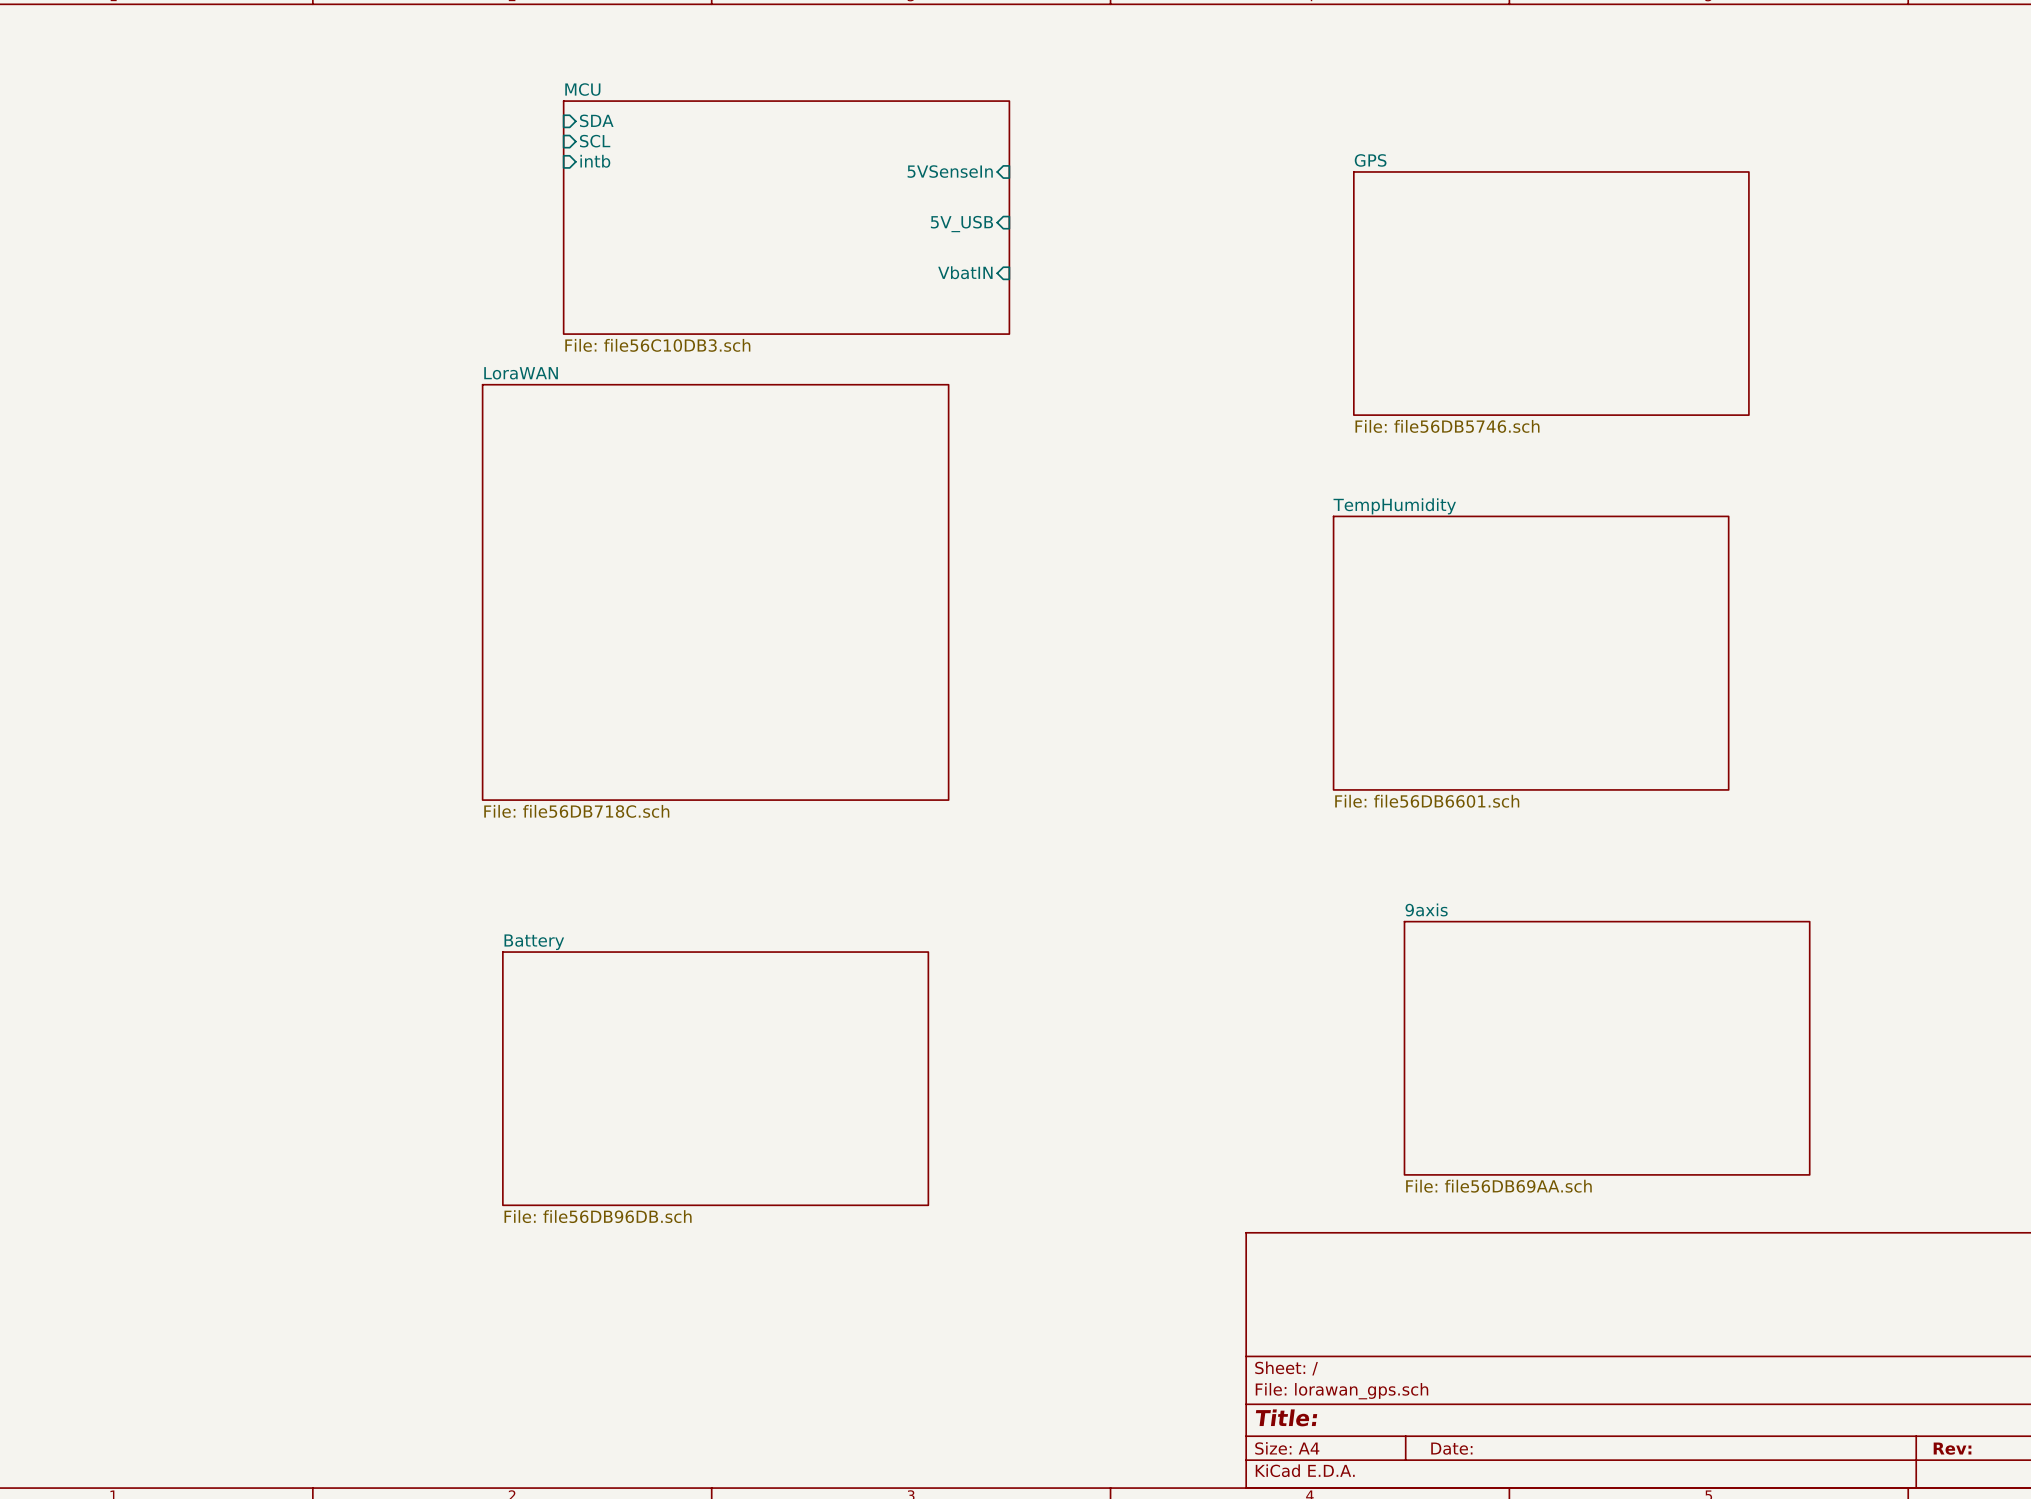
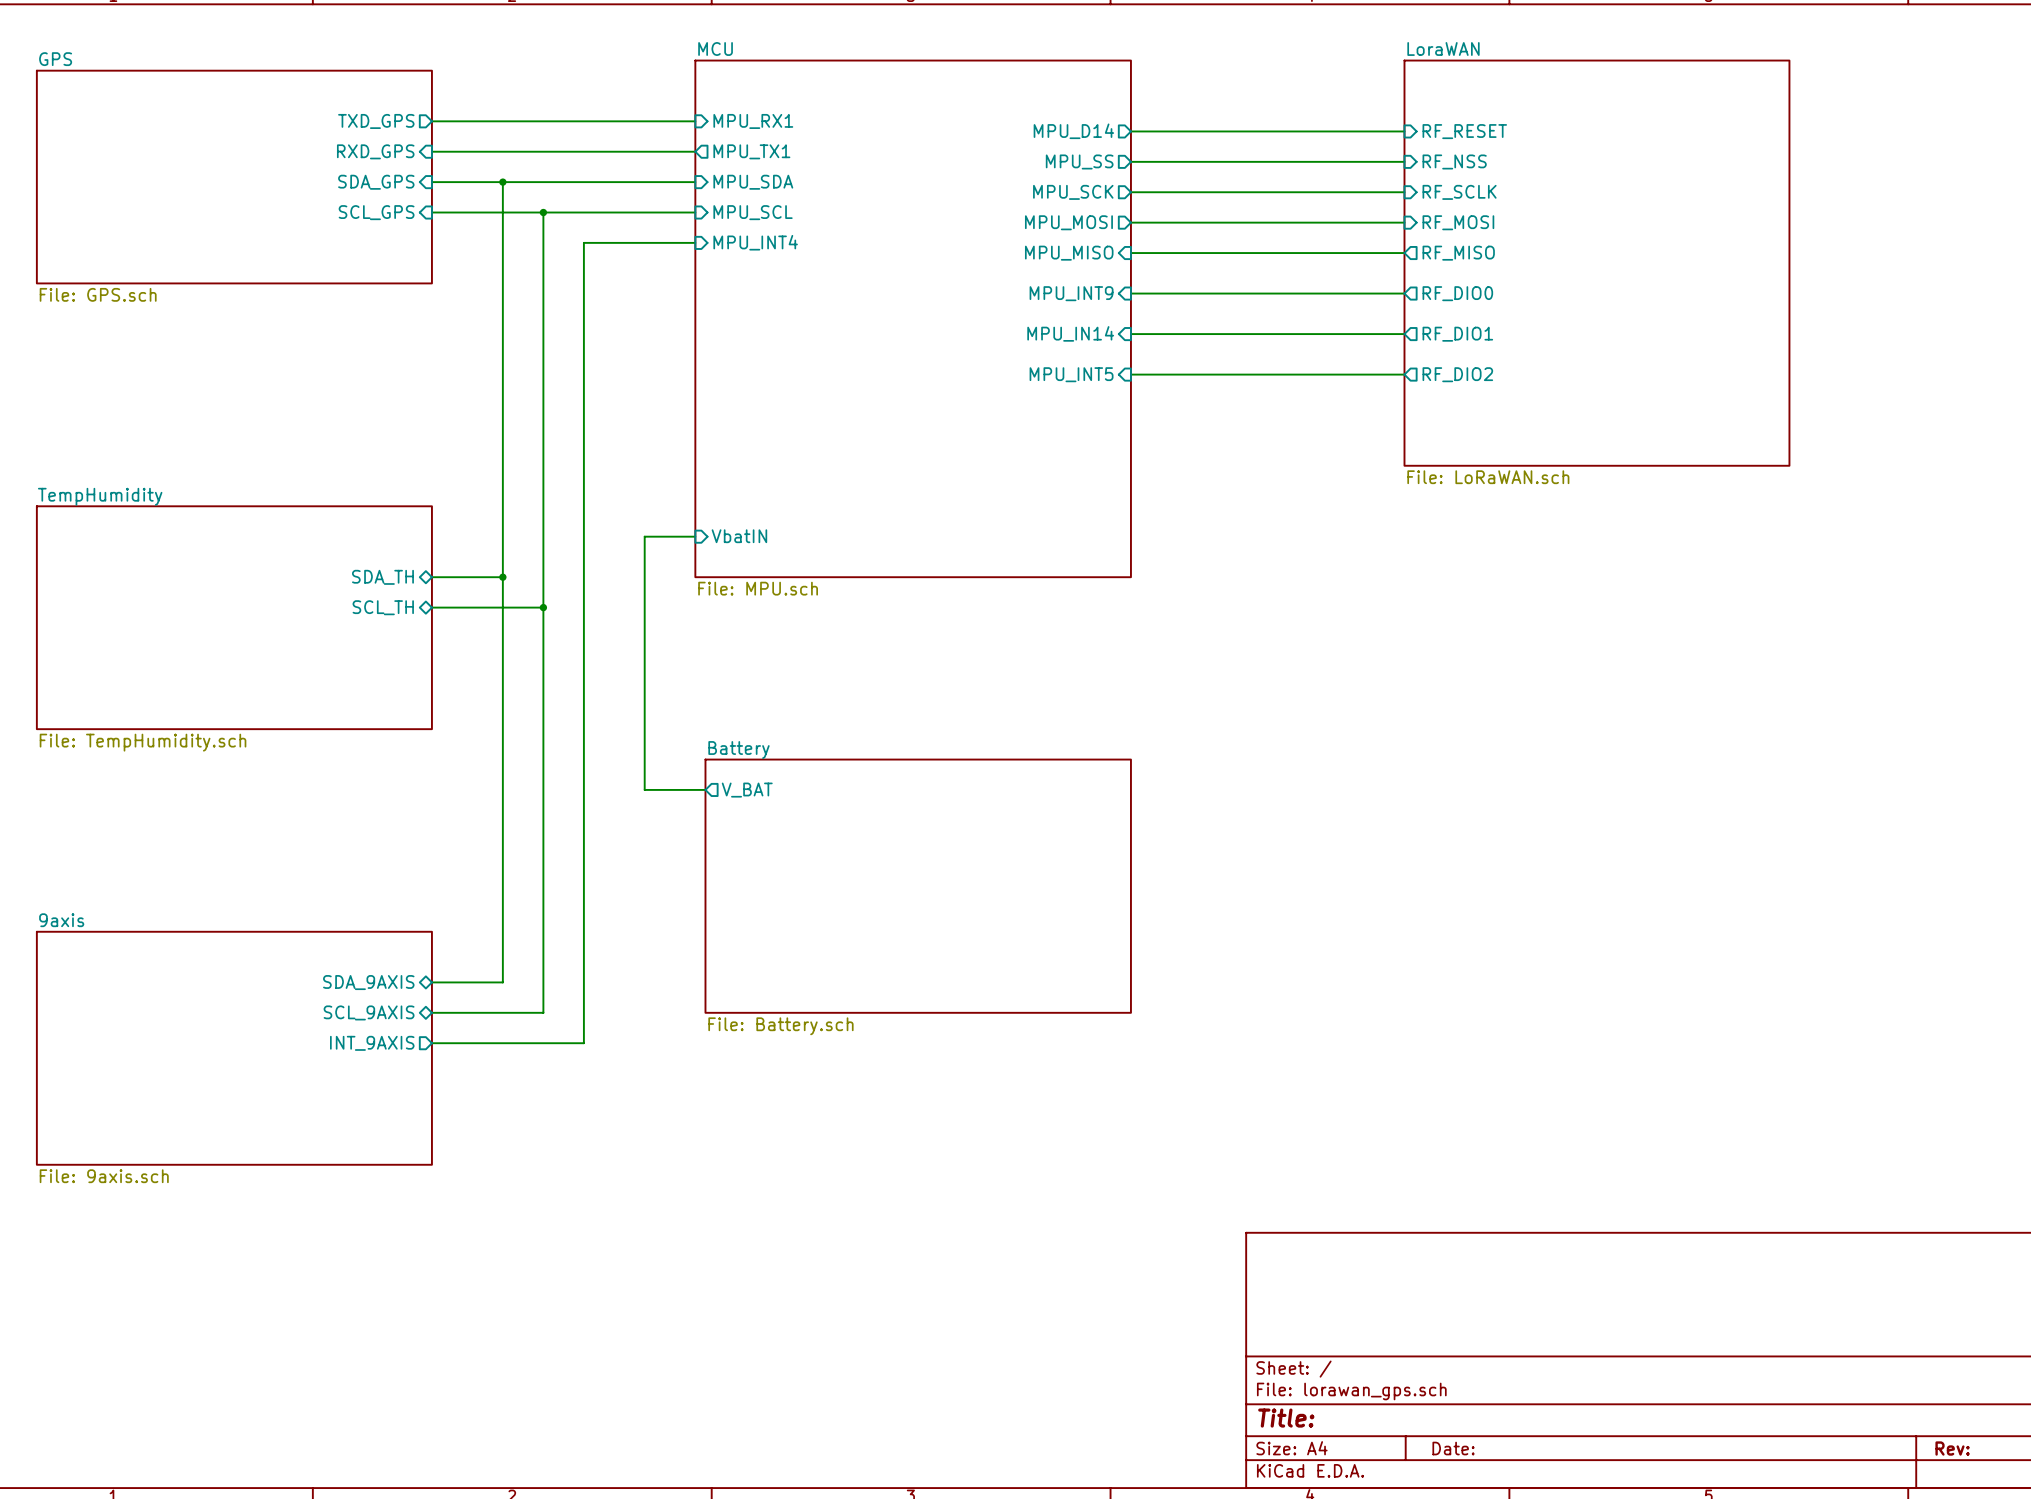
sheet pin: SDA (596, 120) -> none
wire: none -> (431, 121) (695, 121)
sheet pin: none -> TXD_GPS (376, 121)
sheet pin: none -> MPU_RX1 (753, 121)
wire: none -> (1130, 131) (1404, 131)
sheet pin: none -> MPU_D14 (1073, 131)
sheet pin: none -> RF_RESET (1464, 131)
sheet pin: SCL (595, 141) -> none
wire: none -> (431, 151) (695, 151)
sheet pin: none -> RXD_GPS (375, 151)
sheet pin: none -> MPU_TX1 (751, 151)
sheet pin: intb (595, 161) -> none
wire: none -> (1130, 161) (1404, 161)
sheet pin: none -> MPU_SS (1079, 161)
sheet pin: none -> RF_NSS (1454, 161)
sheet pin: 5VSenseIn (950, 171) -> none
sheet GPS: none -> File: GPS.sch (234, 177)
wire: none -> (431, 182) (695, 182)
wire: none -> (502, 182) (502, 982) (431, 982)
junction: none -> (502, 182)
sheet pin: none -> SDA_GPS (376, 182)
sheet pin: none -> MPU_SDA (753, 182)
wire: none -> (1130, 192) (1404, 192)
sheet pin: none -> MPU_SCK (1073, 192)
sheet pin: none -> RF_SCLK (1459, 192)
wire: none -> (431, 212) (695, 212)
wire: none -> (543, 212) (543, 1012) (431, 1012)
junction: none -> (543, 212)
sheet pin: none -> SCL_GPS (376, 212)
sheet pin: none -> MPU_SCL (753, 212)
sheet MCU: File: file56C10DB3.sch (786, 217) -> none
wire: none -> (1130, 222) (1404, 222)
sheet pin: 5V_USB (961, 224) -> none
sheet pin: none -> MPU_MOSI (1068, 222)
sheet pin: none -> RF_MOSI (1458, 222)
wire: none -> (695, 242) (583, 242) (583, 1043) (431, 1043)
sheet pin: none -> MPU_INT4 (755, 242)
wire: none -> (1130, 253) (1404, 253)
sheet pin: none -> MPU_MISO (1069, 253)
sheet pin: none -> RF_MISO (1458, 253)
sheet LoraWAN: none -> File: LoRaWAN.sch (1596, 263)
sheet pin: VbatIN (965, 272) -> none
wire: none -> (1130, 293) (1404, 293)
sheet GPS: File: file56DB5746.sch (1551, 293) -> none
sheet pin: none -> MPU_INT9 (1071, 293)
sheet pin: none -> RF_DIO0 (1457, 293)
sheet MCU: none -> File: MPU.sch (913, 318)
wire: none -> (1130, 334) (1404, 334)
sheet pin: none -> MPU_IN14 (1070, 333)
sheet pin: none -> RF_DIO1 (1457, 334)
wire: none -> (1130, 374) (1404, 374)
sheet pin: none -> RF_DIO2 (1457, 374)
sheet pin: none -> MPU_INT5 (1071, 374)
wire: none -> (695, 536) (644, 536) (644, 789) (705, 789)
sheet pin: none -> VbatIN (739, 536)
wire: none -> (431, 577) (502, 577)
junction: none -> (502, 577)
sheet pin: none -> SDA_TH (382, 577)
sheet LoraWAN: File: file56DB718C.sch (715, 592) -> none
wire: none -> (431, 607) (543, 607)
junction: none -> (543, 607)
sheet pin: none -> SCL_TH (383, 607)
sheet TempHumidity: none -> File: TempHumidity.sch (234, 617)
sheet TempHumidity: File: file56DB6601.sch (1531, 653) -> none
sheet pin: none -> V_BAT (747, 790)
sheet Battery: none -> File: Battery.sch (918, 886)
sheet 9axis shape: [1404, 921, 1810, 1175] -> [36, 931, 432, 1165]
sheet pin: none -> SDA_9AXIS (368, 982)
sheet pin: none -> SCL_9AXIS (369, 1012)
sheet pin: none -> INT_9AXIS (372, 1043)
sheet Battery: File: file56DB96DB.sch (715, 1078) -> none
sheet 9axis value: File: file56DB69AA.sch (1498, 1186) -> File: 9axis.sch (104, 1176)

